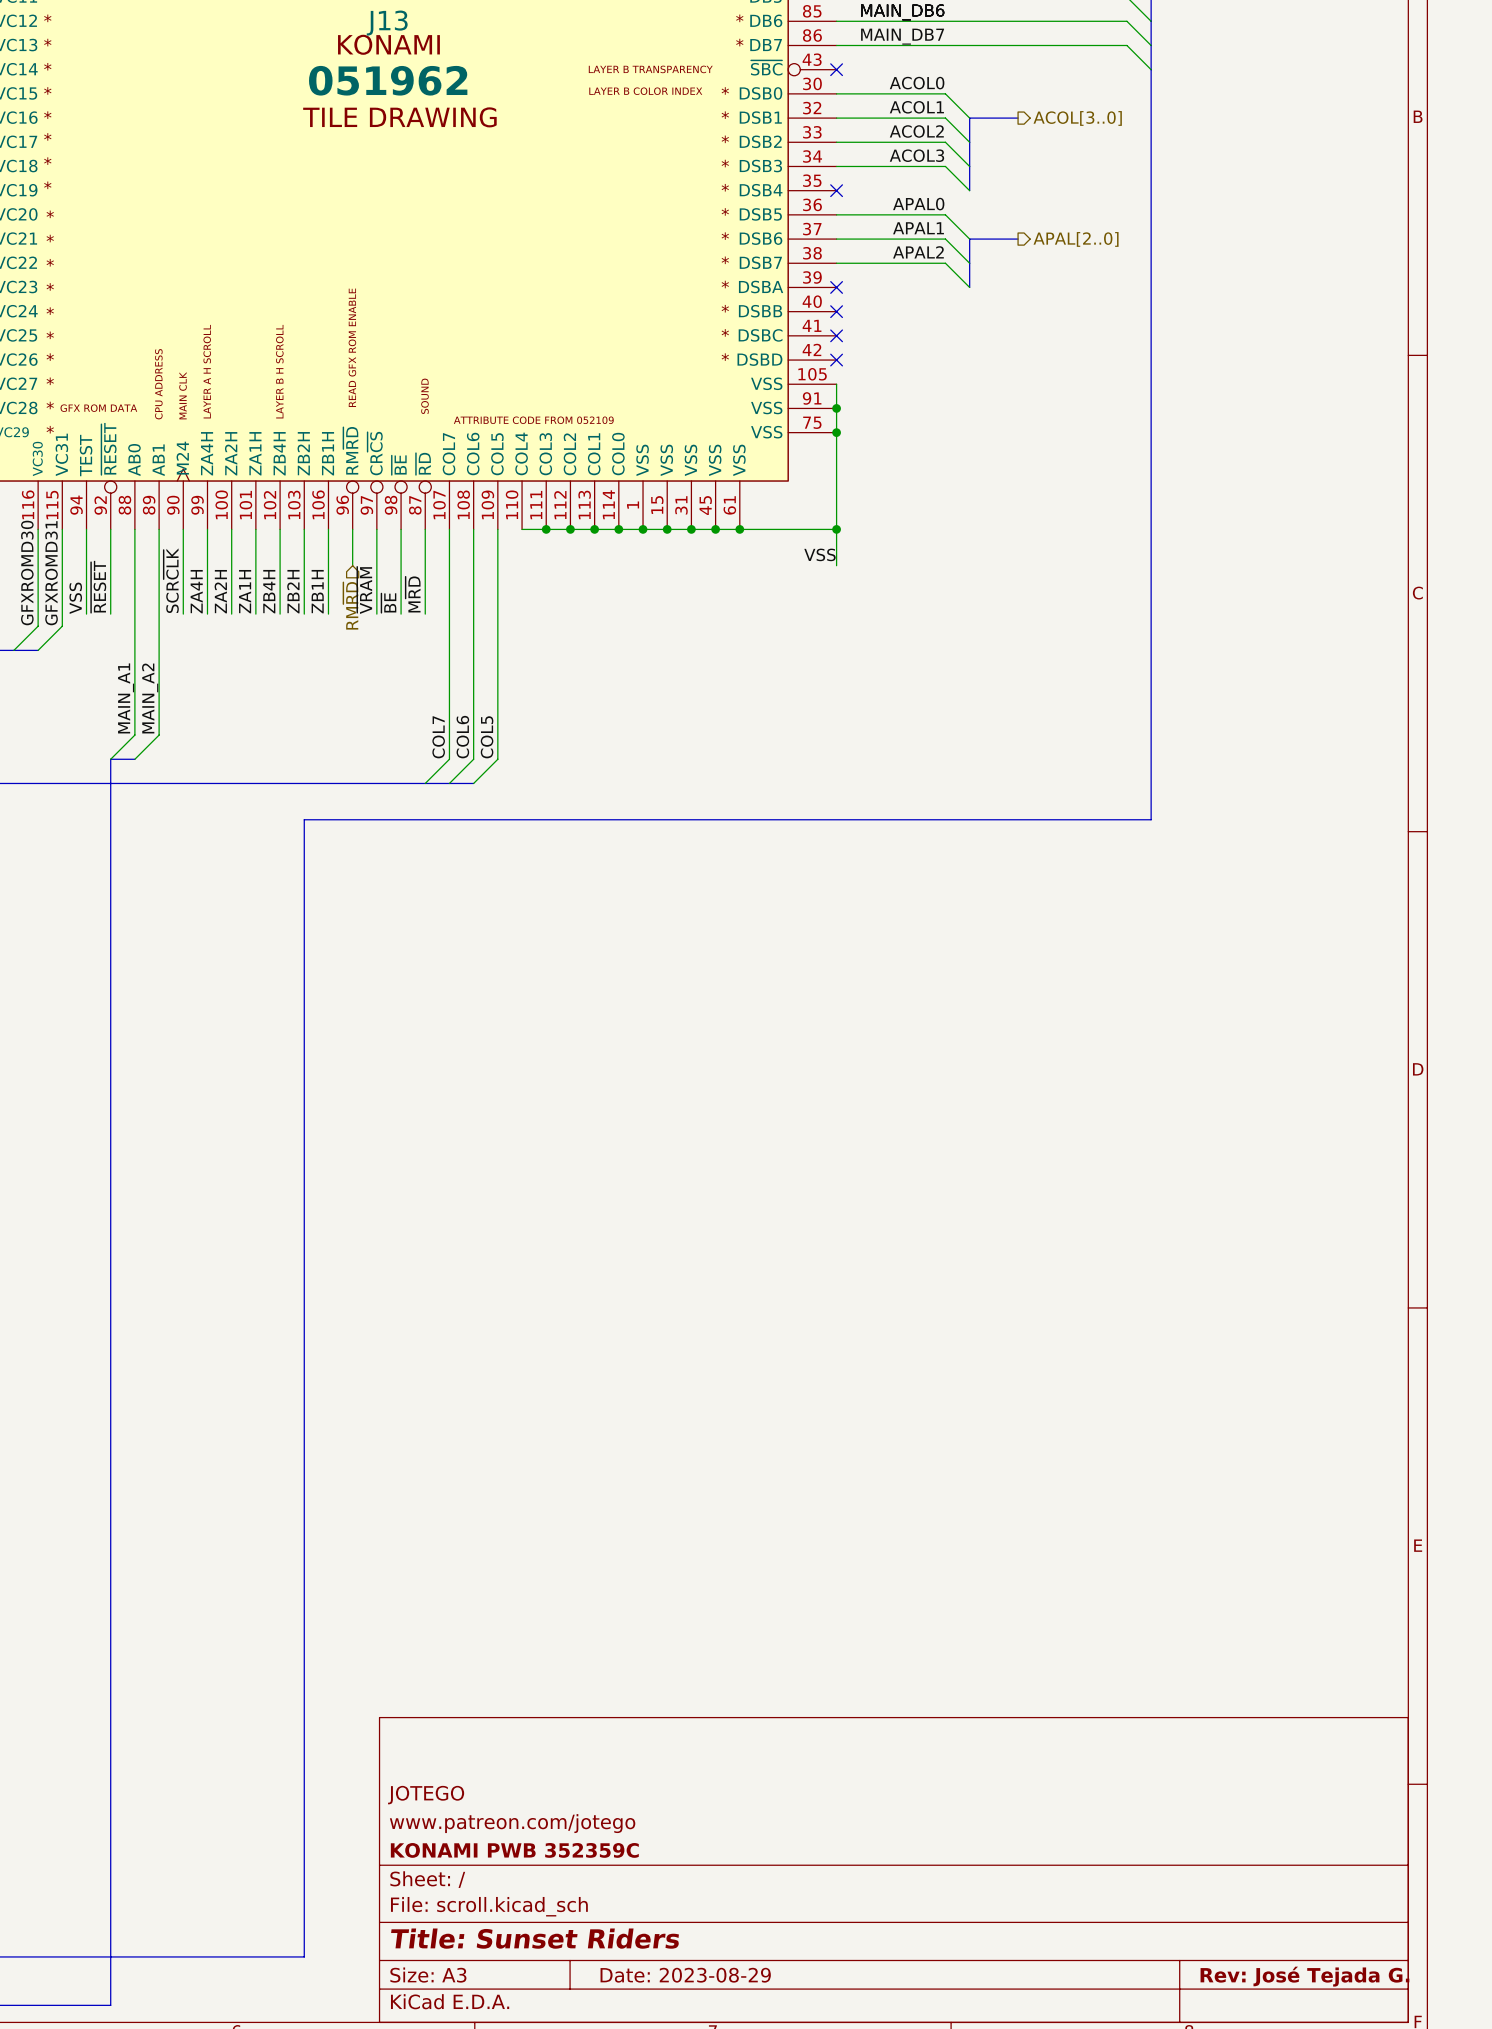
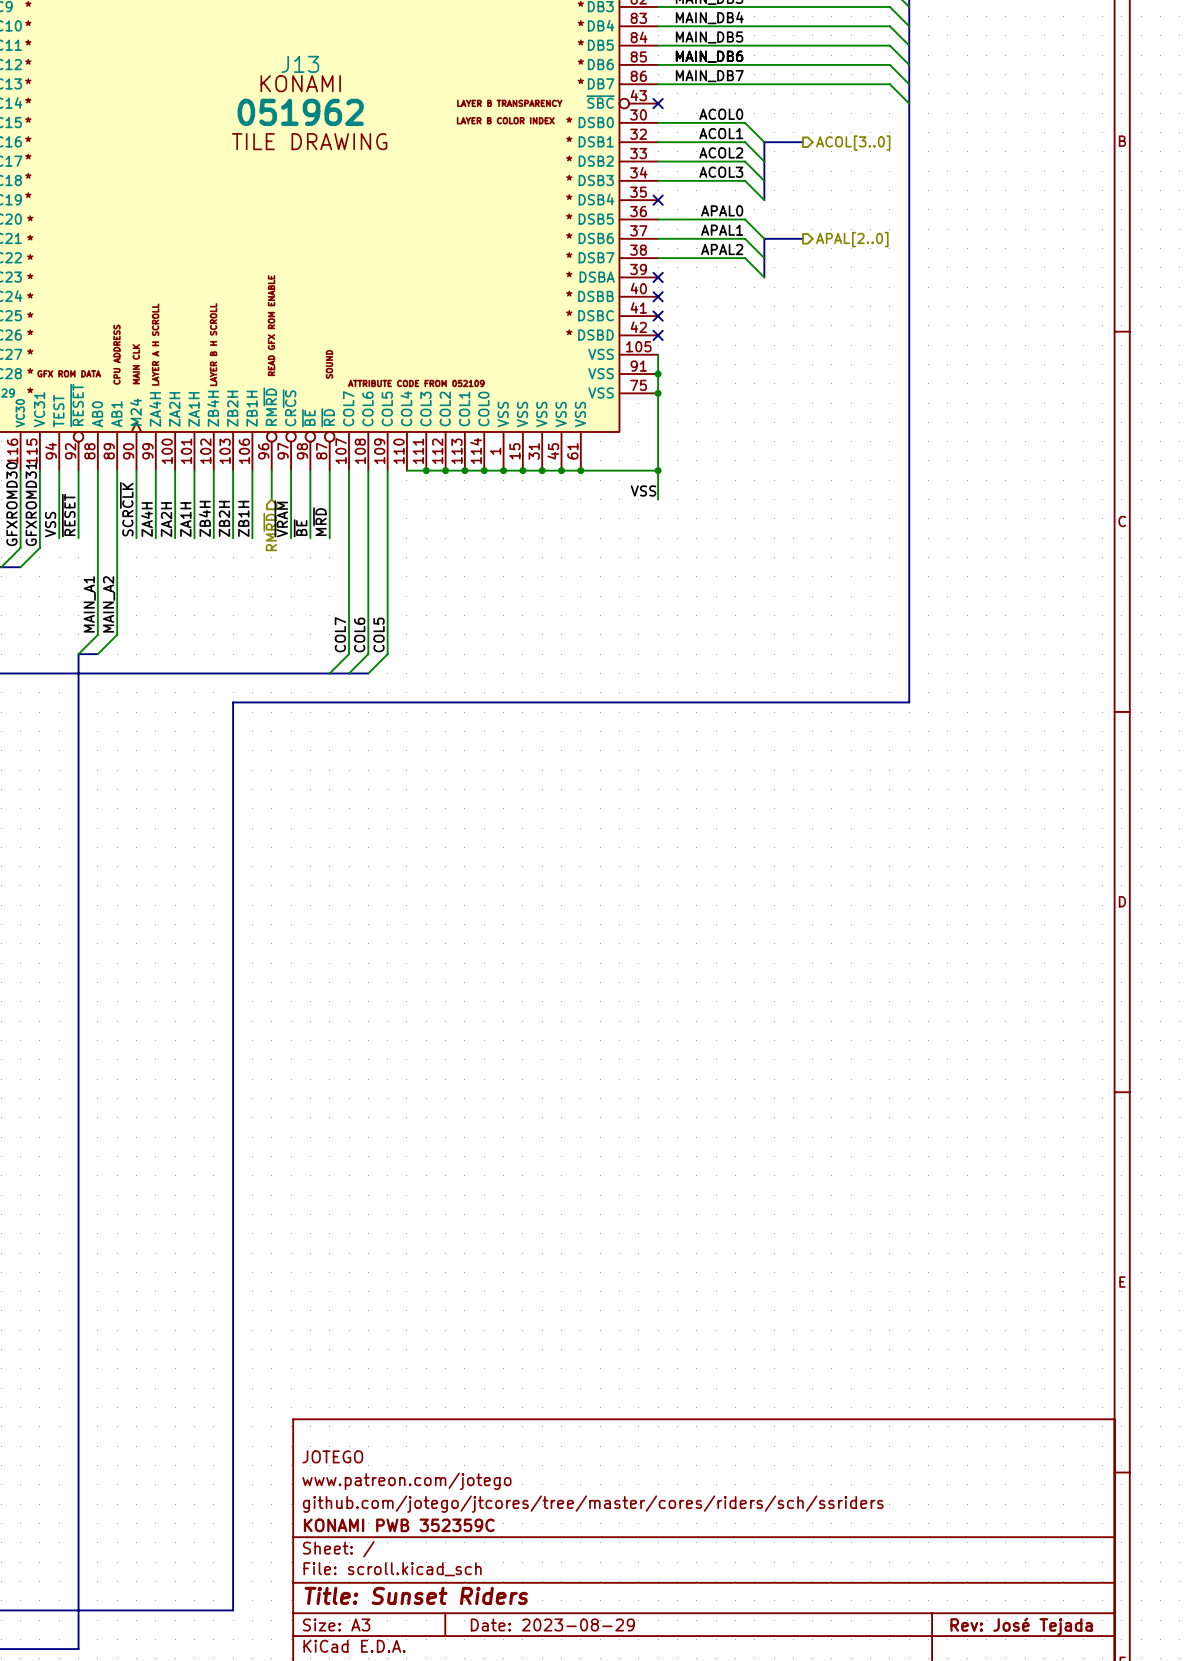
title block: none -> JOTEGO (332, 1456)
title block: JOTEGO (426, 1795) -> www.patreon.com/jotego (406, 1481)
title block: www.patreon.com/jotego (512, 1823) -> github.com/jotego/jtcores/tree/master/cores/riders/sch/ssriders (593, 1504)
title block: Rev: José Tejada G. (1304, 1976) -> Rev: José Tejada (1021, 1626)

